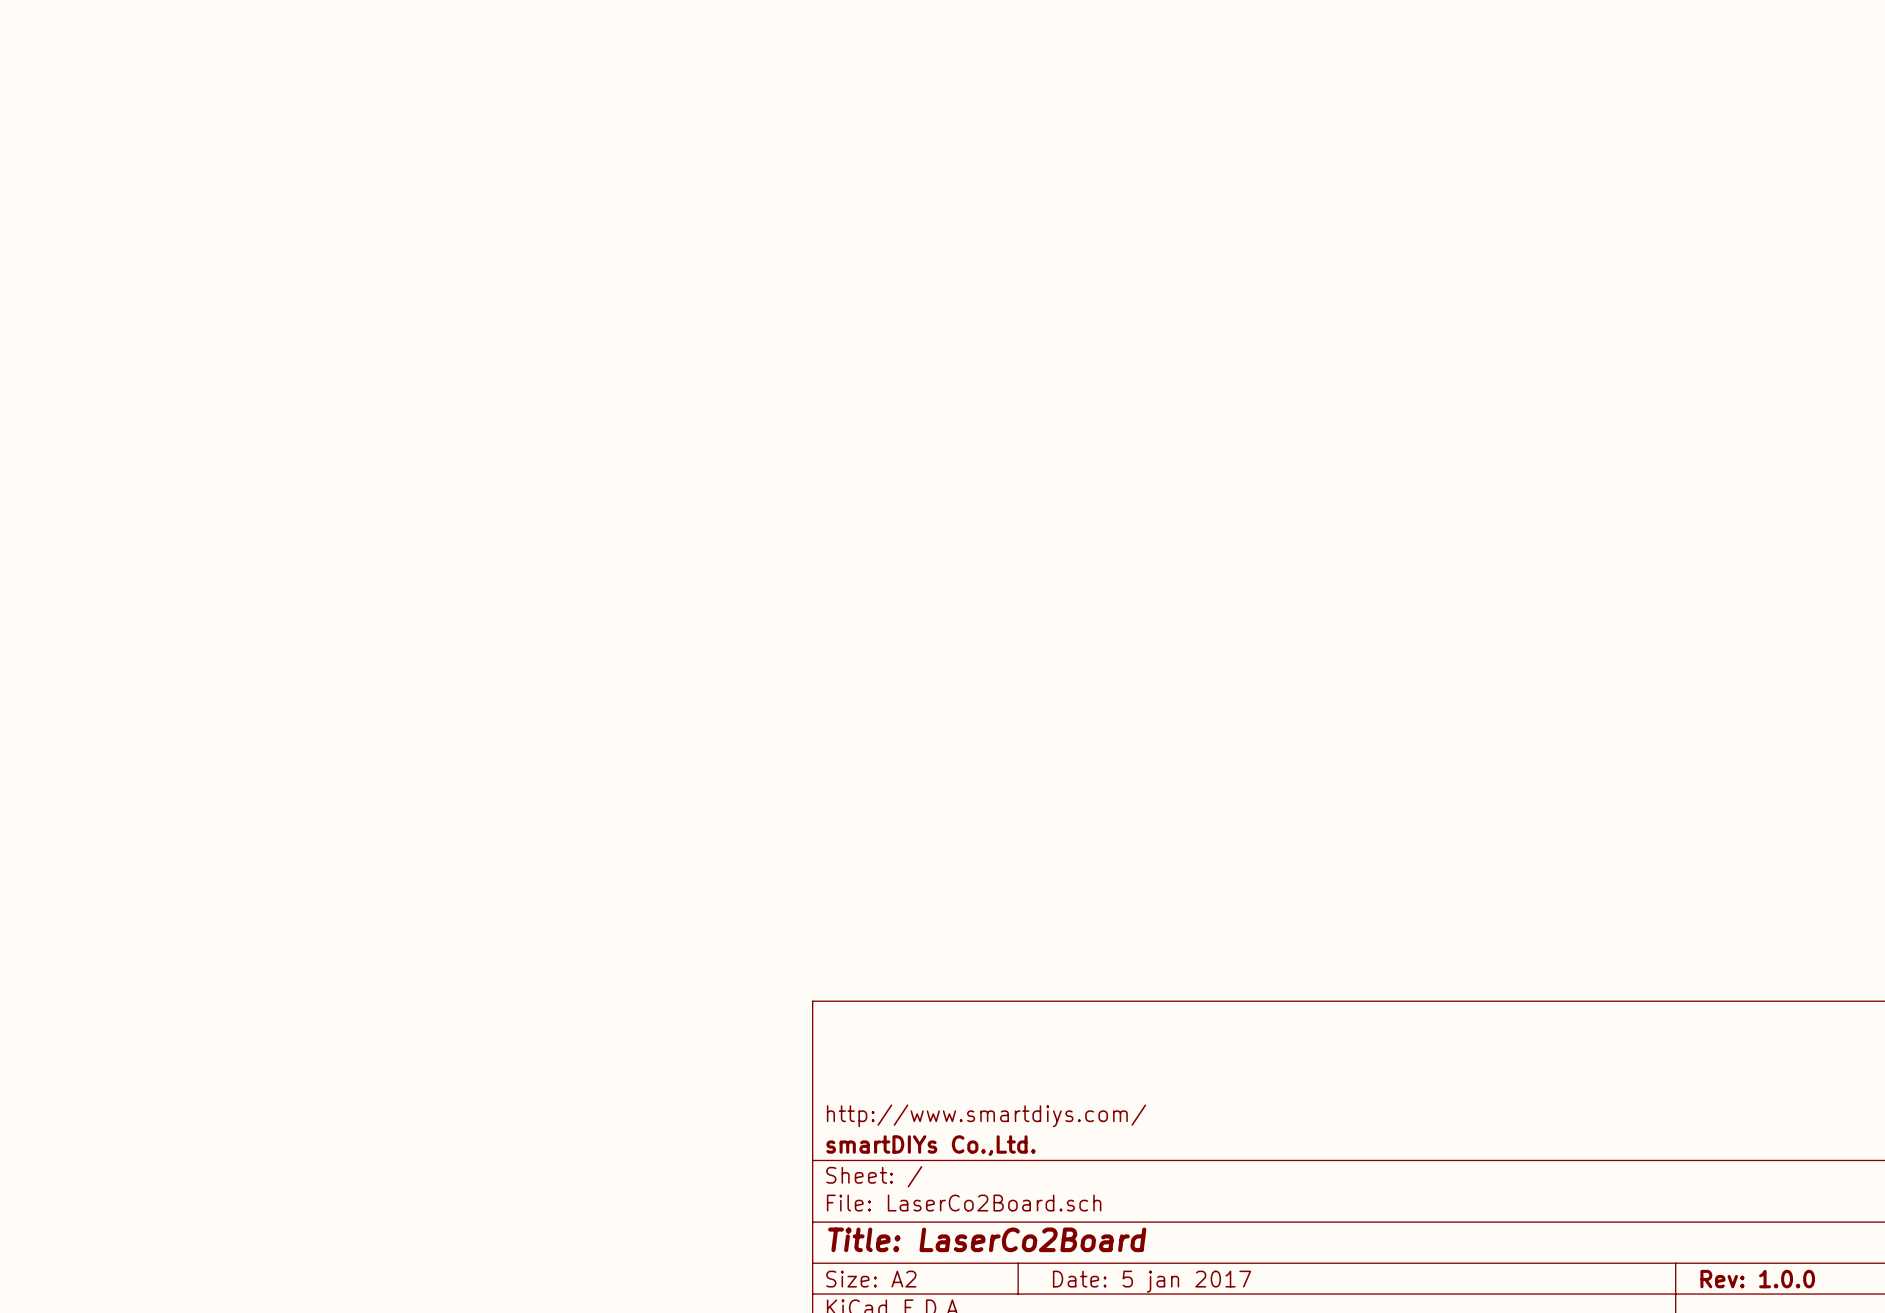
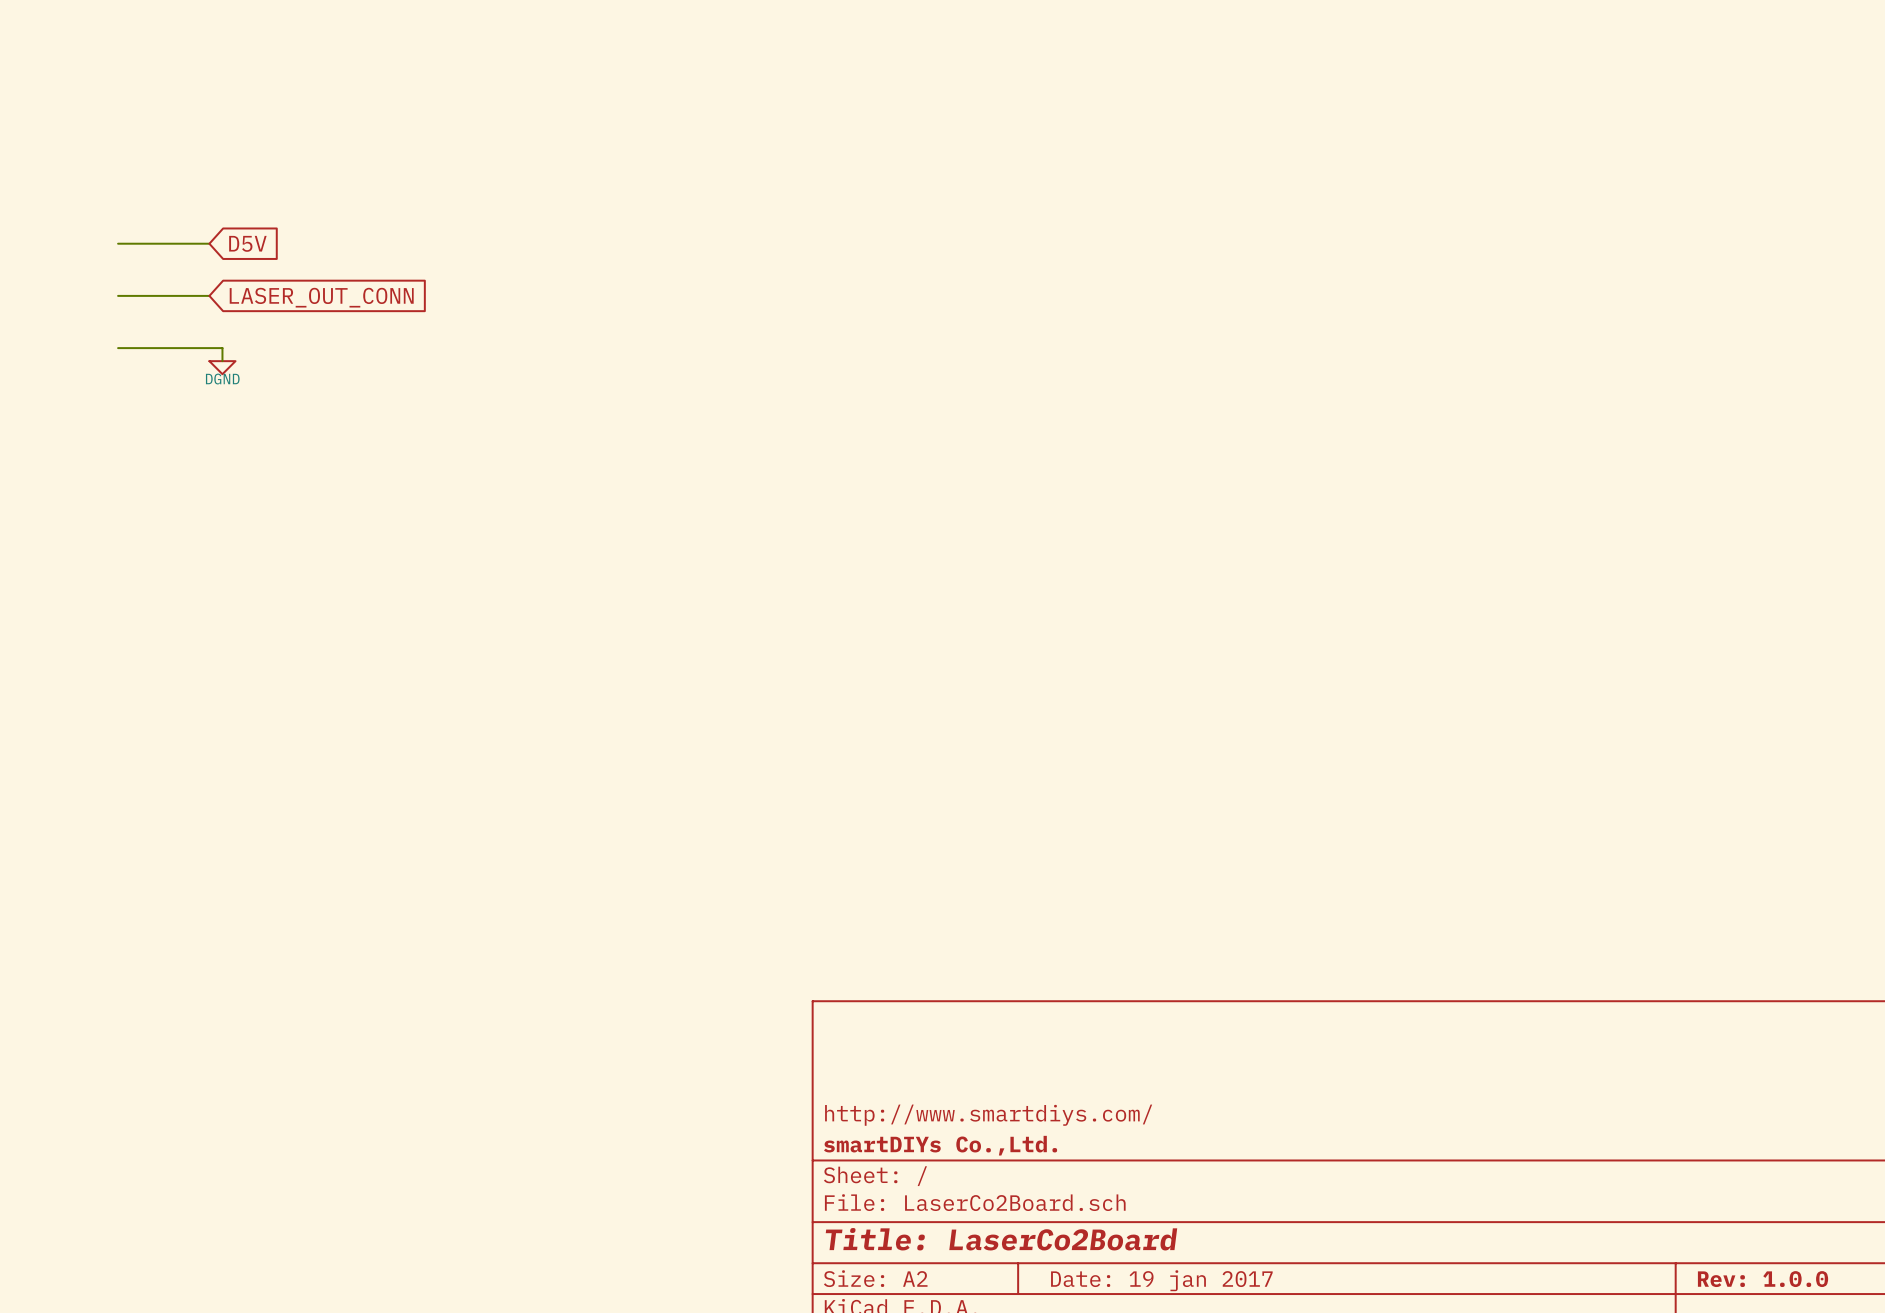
wire: none -> (118, 243) (209, 243)
global label: none -> D5V (247, 243)
wire: none -> (118, 295) (209, 295)
global label: none -> LASER_OUT_CONN (321, 297)
wire: none -> (118, 348) (222, 348) (222, 361)
power symbol: none -> DGND (222, 367)
title block: Date: 5 jan 2017 (1152, 1281) -> Date: 19 jan 2017 (1161, 1280)

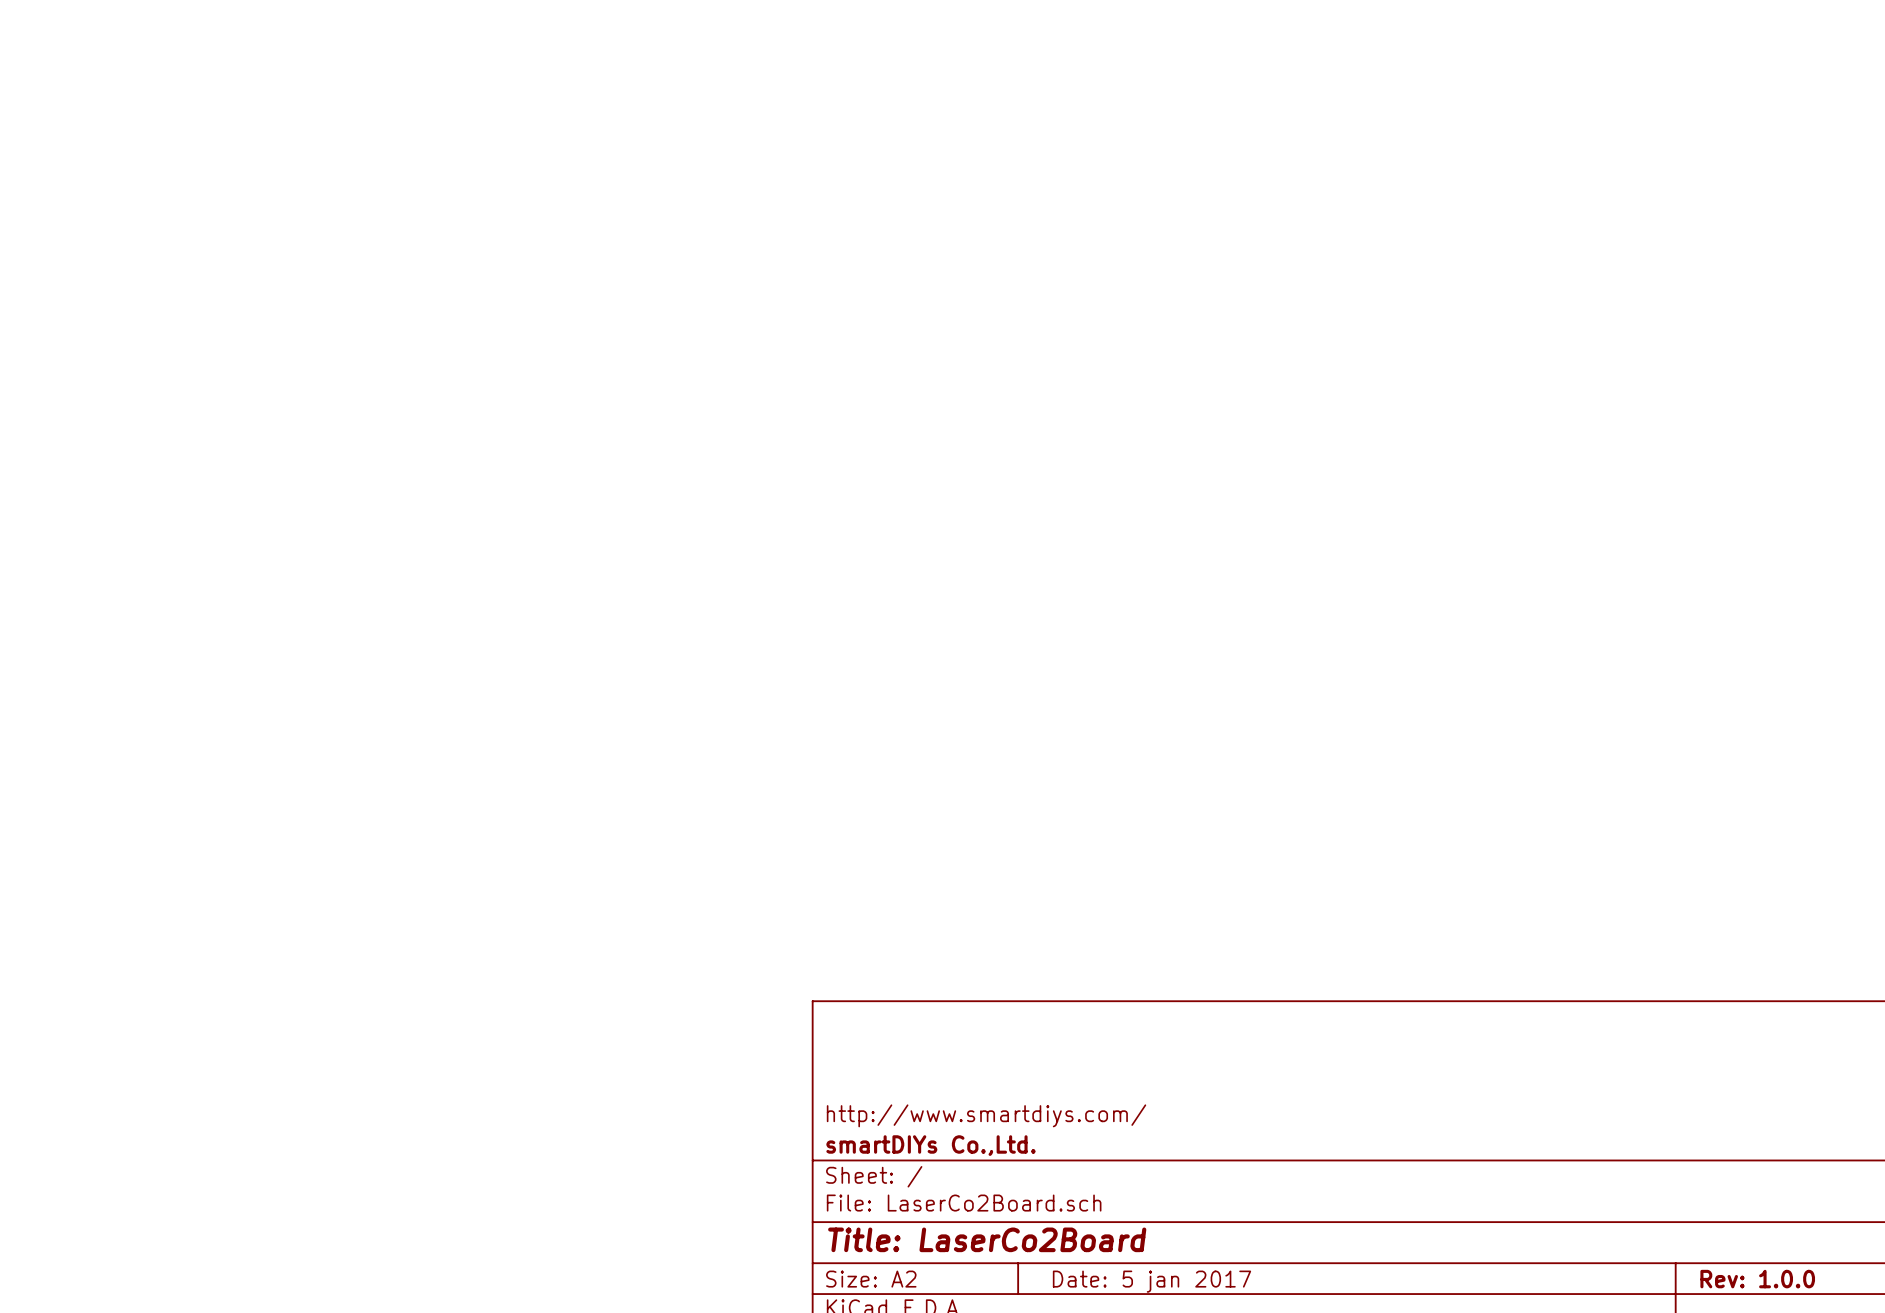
wire: (118, 243) (209, 243) -> none
global label: D5V (247, 243) -> none
wire: (118, 295) (209, 295) -> none
global label: LASER_OUT_CONN (321, 297) -> none
wire: (118, 348) (222, 348) (222, 361) -> none
power symbol: DGND (222, 367) -> none
title block: Date: 19 jan 2017 (1161, 1280) -> Date: 5 jan 2017 (1152, 1281)

